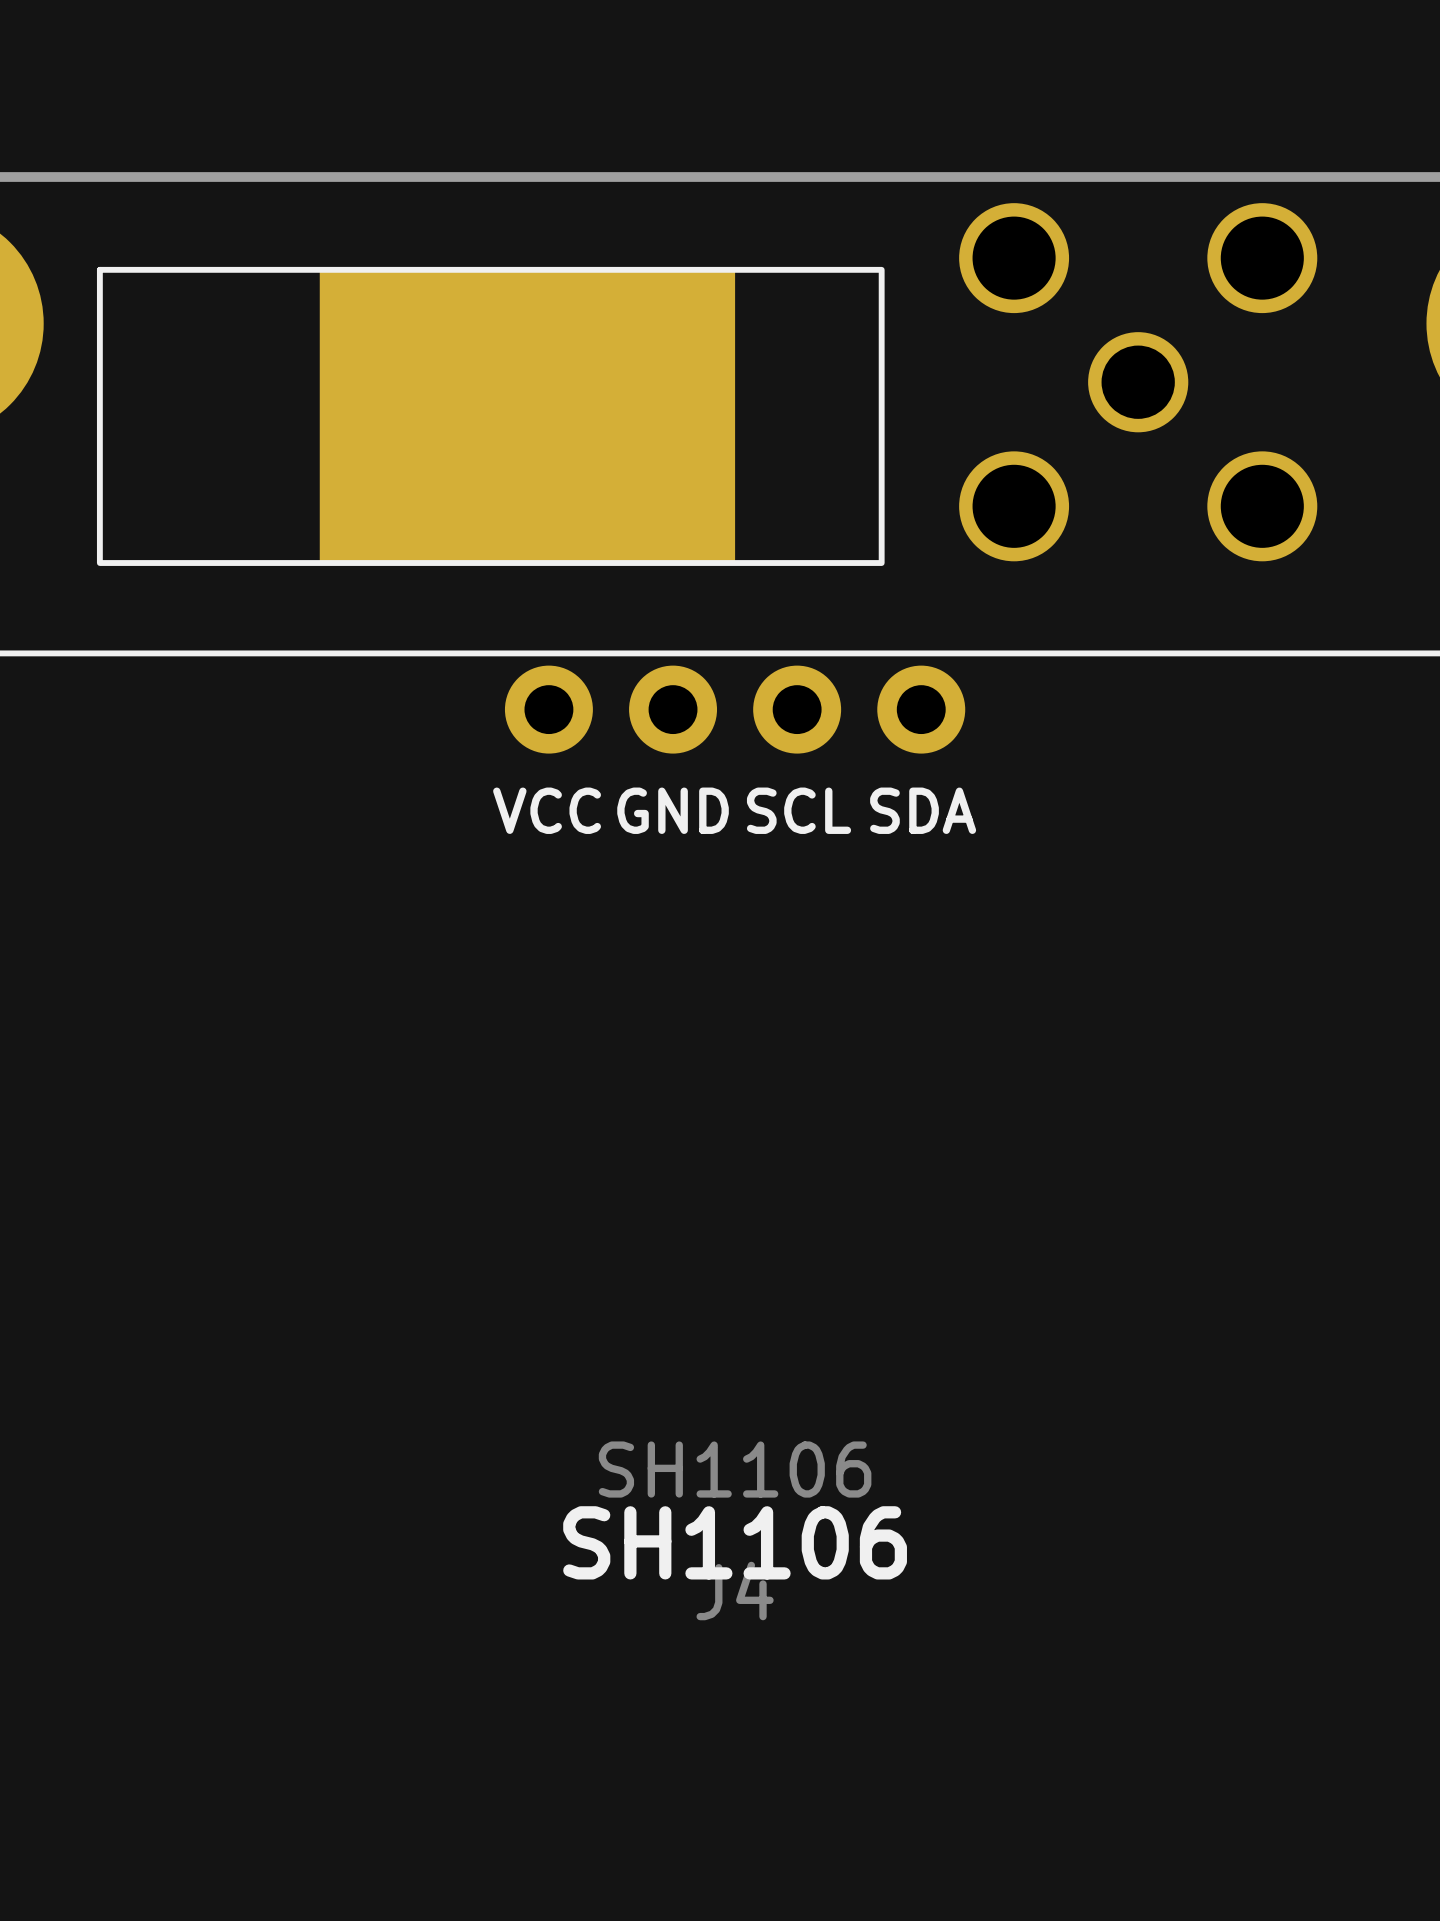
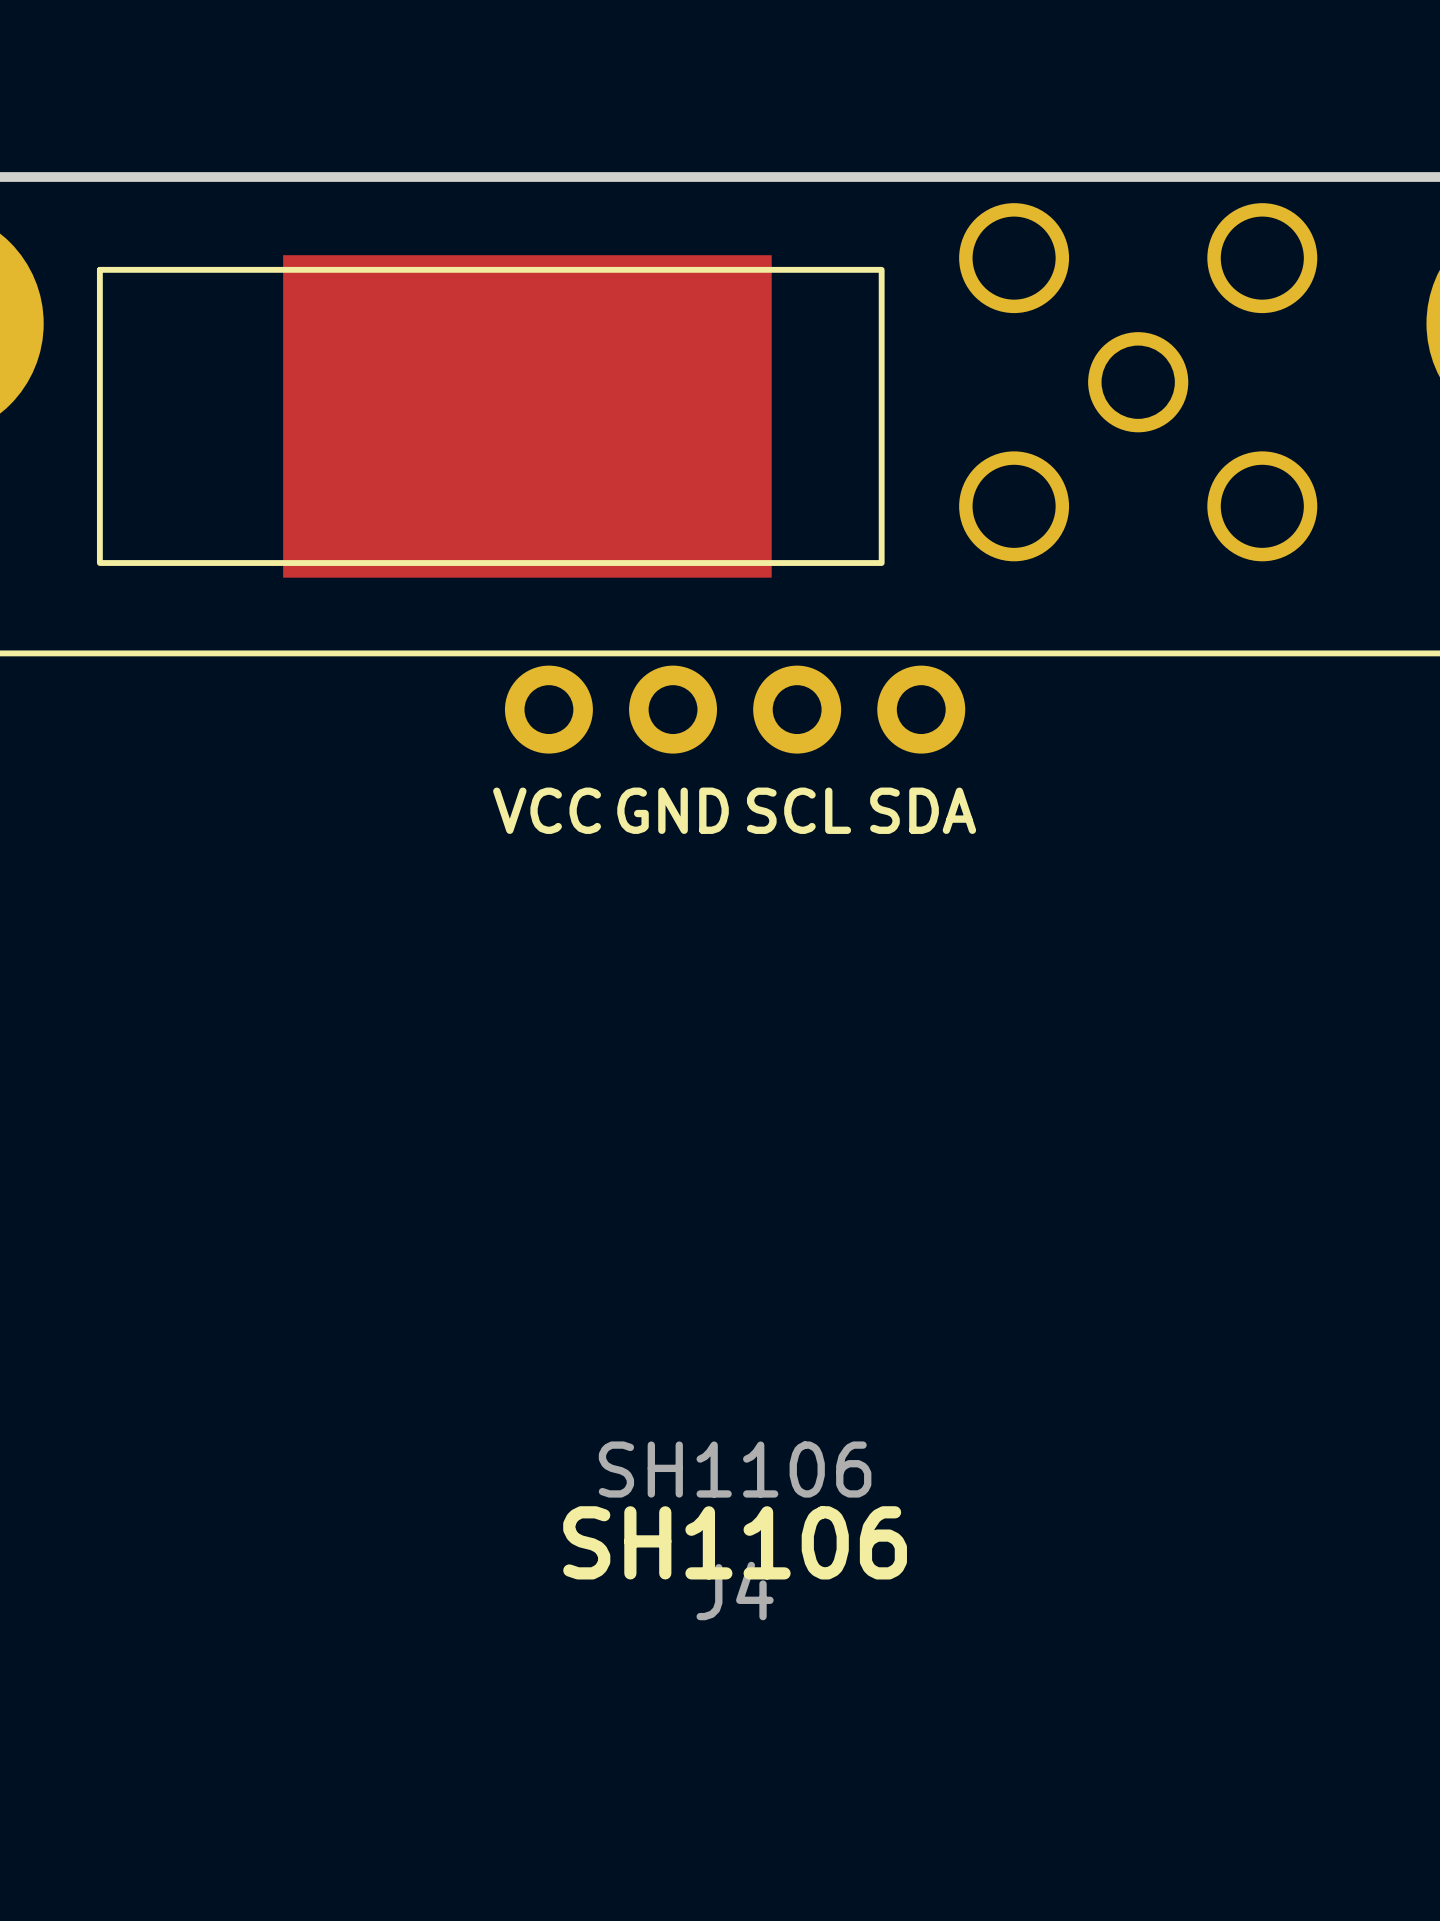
part footprint: [96, 266, 885, 566] -> [96, 255, 885, 578]

